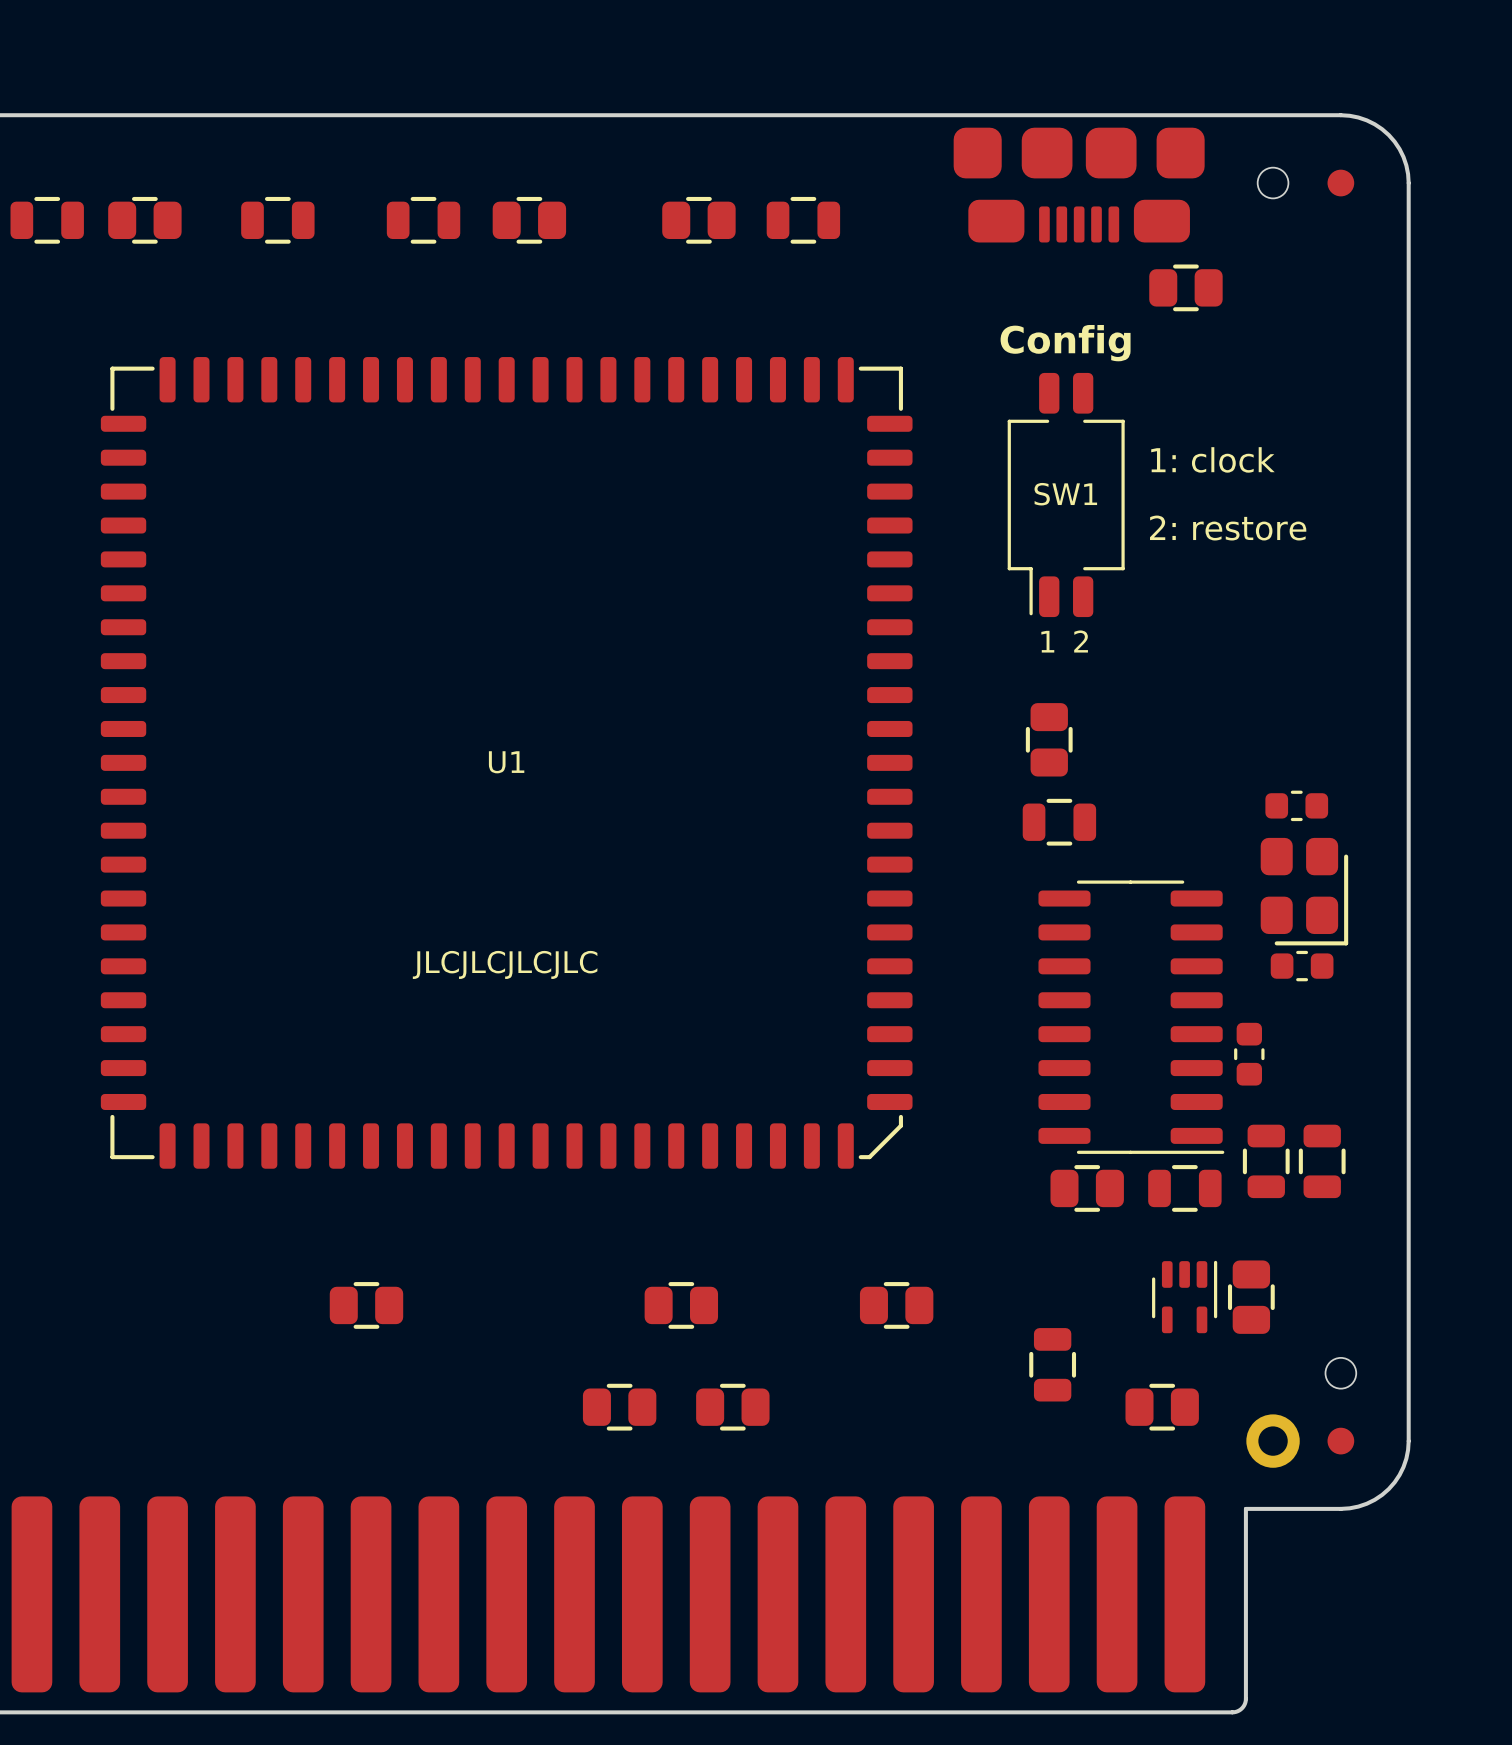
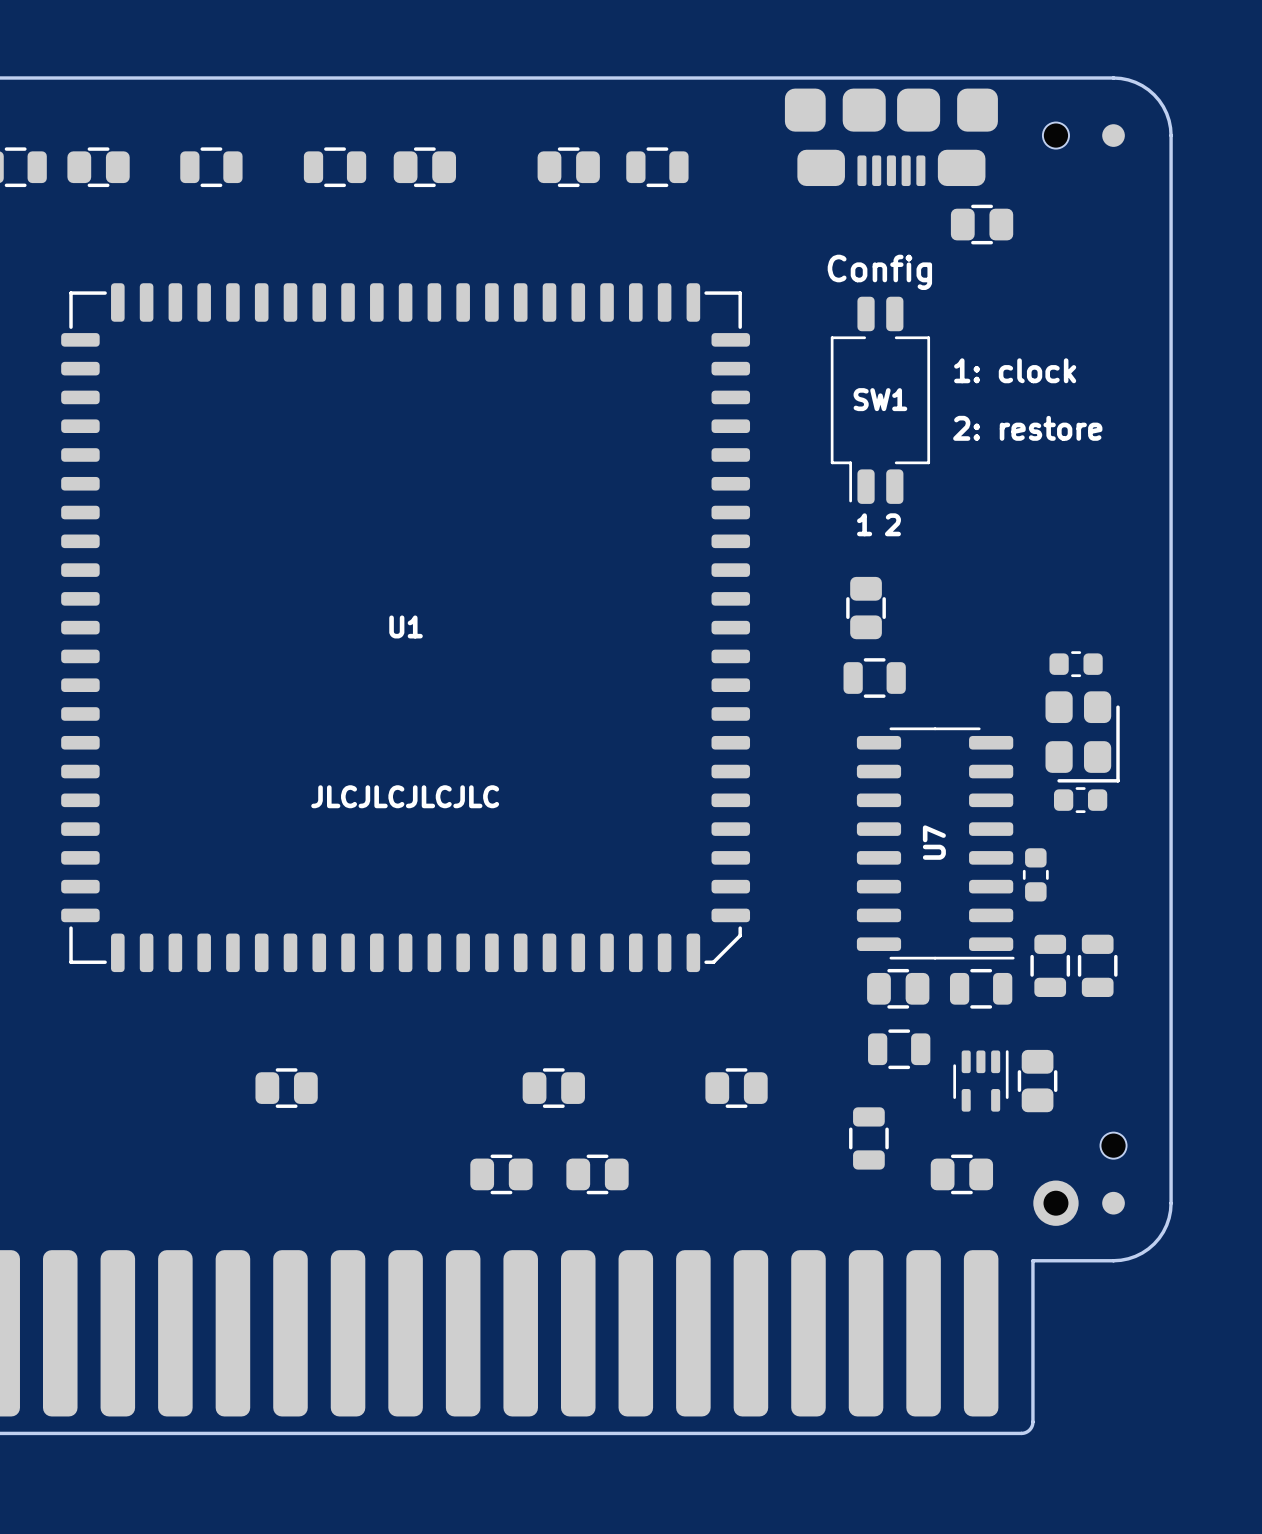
U7 name: none -> U7 (934, 842)
part: none -> (899, 1049)

